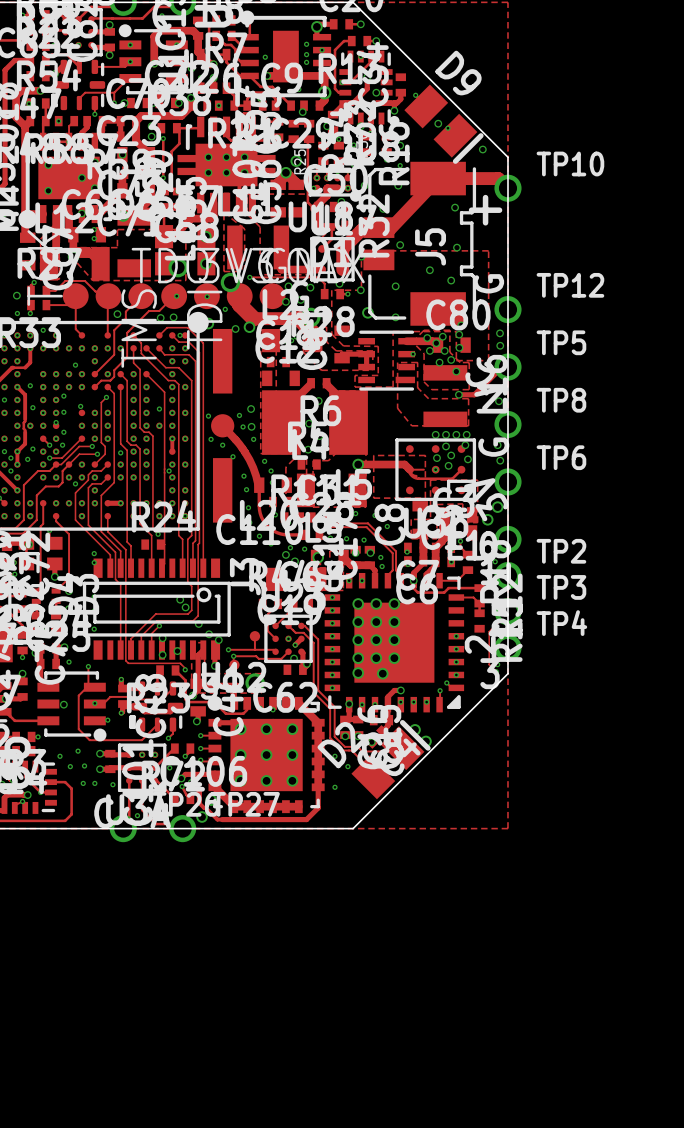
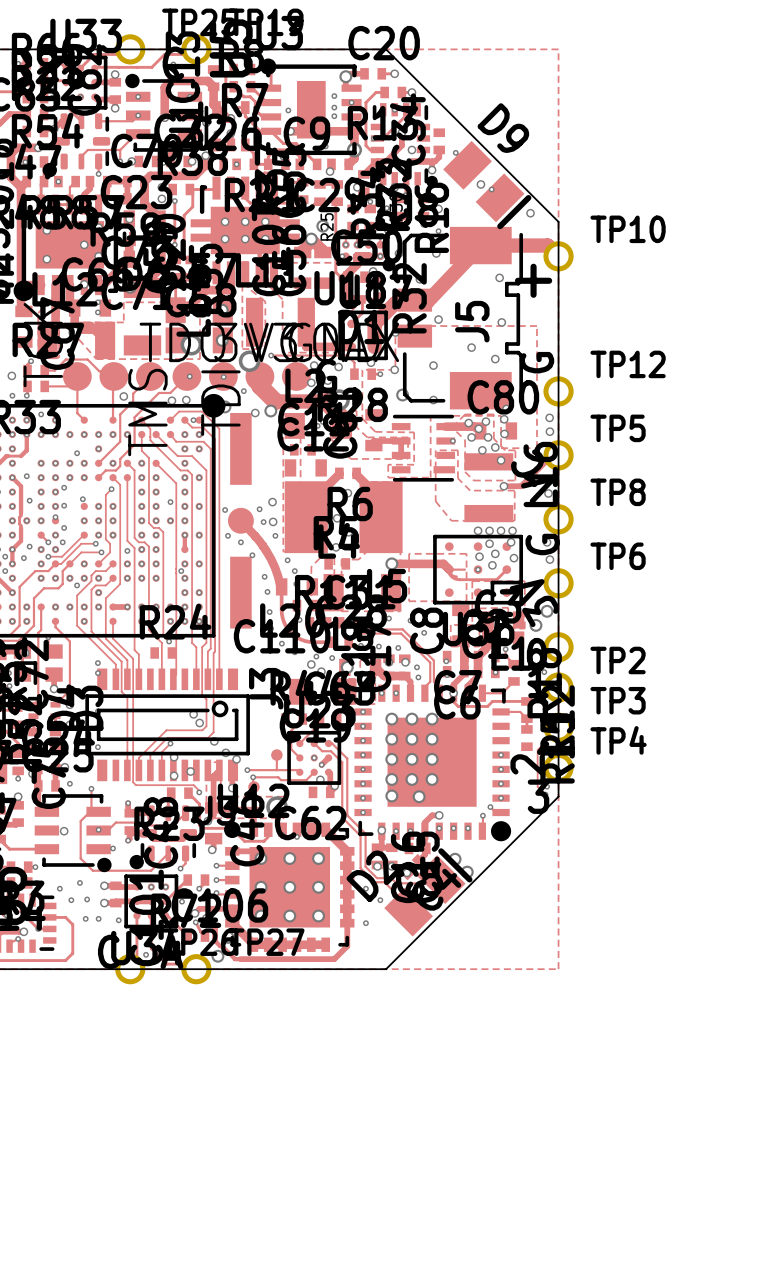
part footprint: [51, 59, 106, 111] -> [42, 113, 111, 178]
part footprint: [324, 572, 465, 713] -> [354, 684, 512, 842]
part footprint: [129, 681, 184, 732] -> [129, 805, 198, 870]

